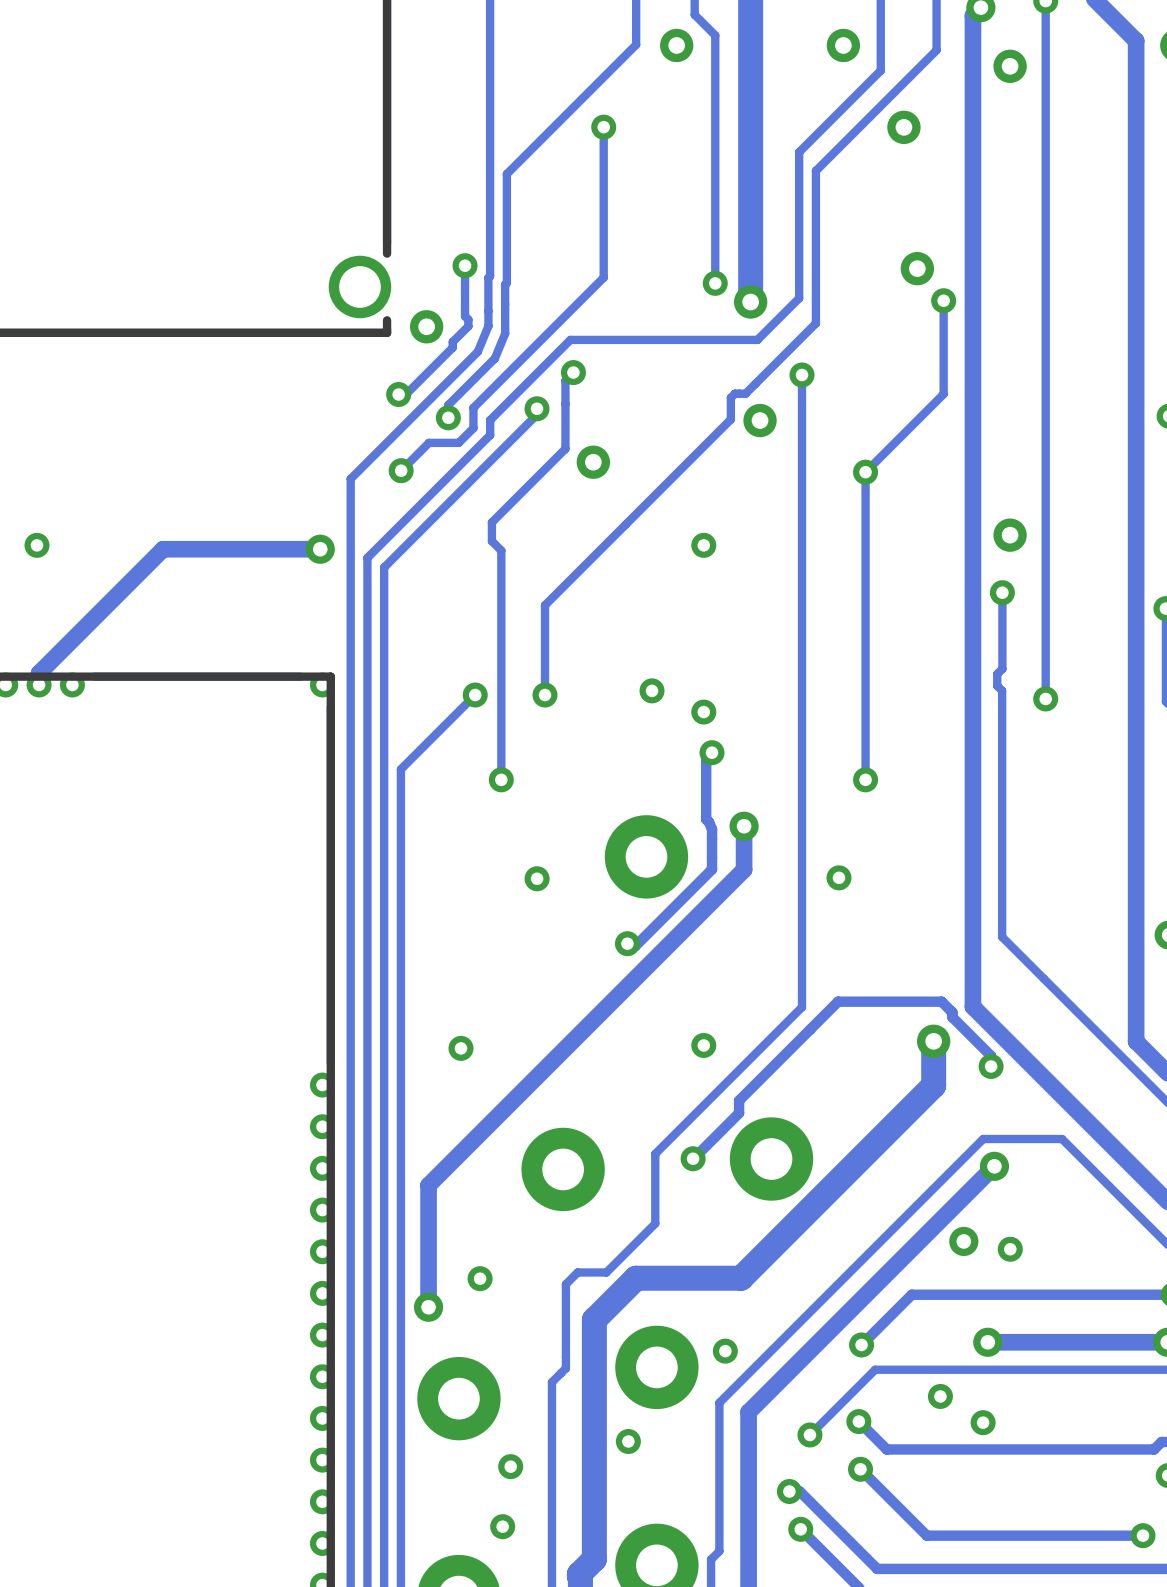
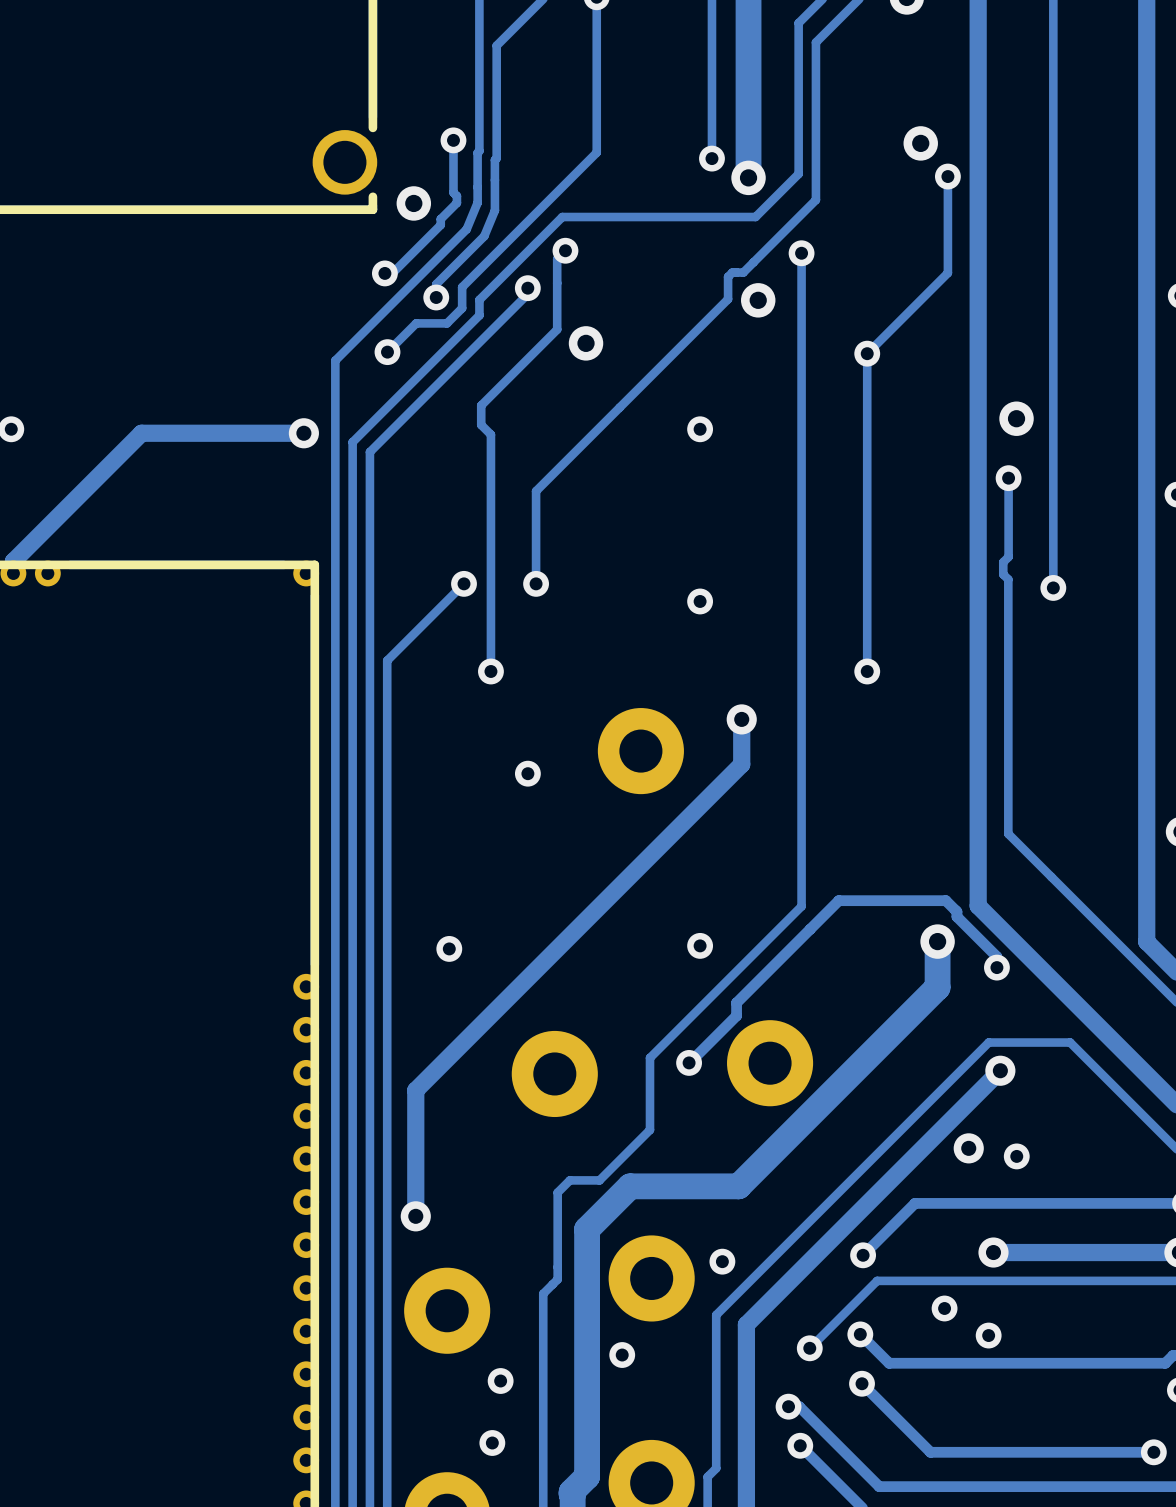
via: (652, 690) -> none
track: (711, 752) (706, 758) (706, 819) (712, 829) (712, 869) (635, 946) (630, 946) (627, 943) -> none
via: (711, 752) -> none
via: (838, 877) -> none
via: (627, 943) -> none
via: (480, 1278) -> none

